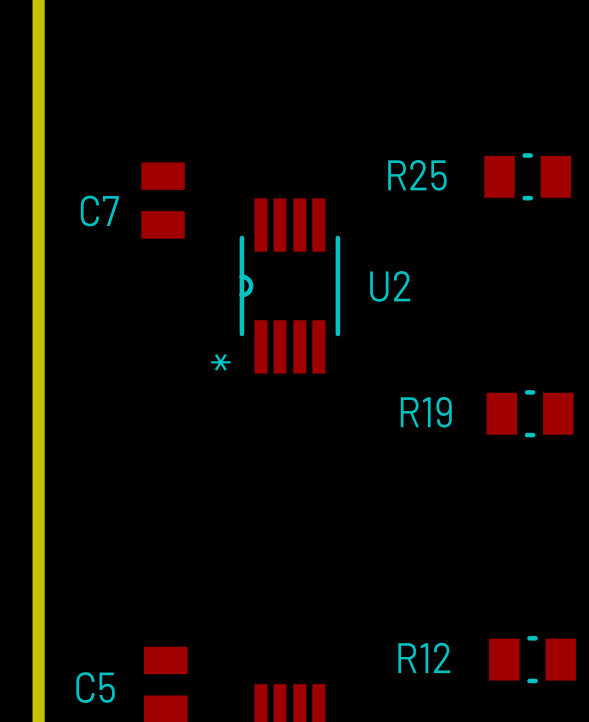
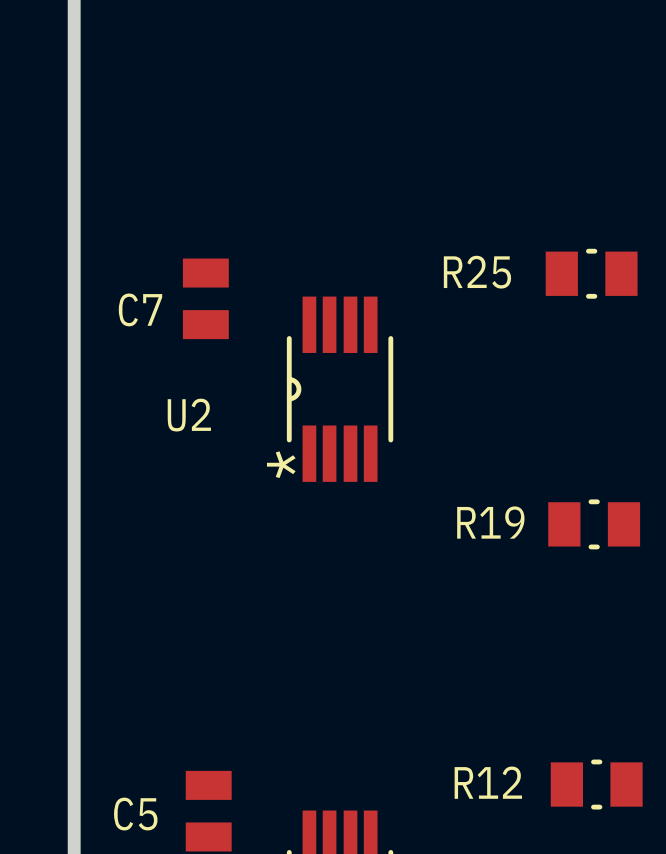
U2 name position: U2 (390, 286) -> U2 (189, 415)

